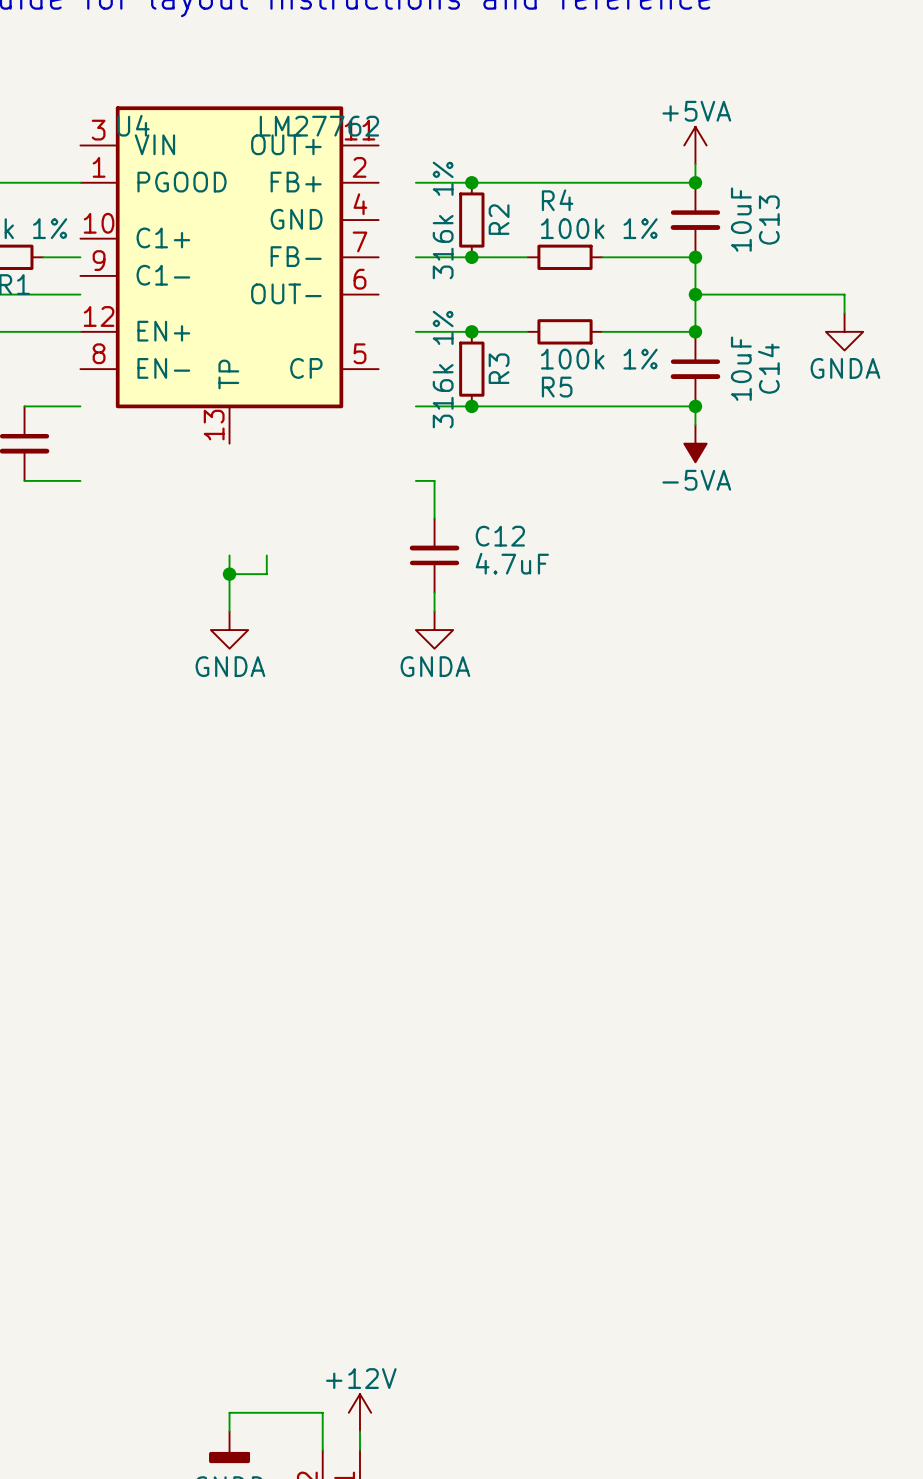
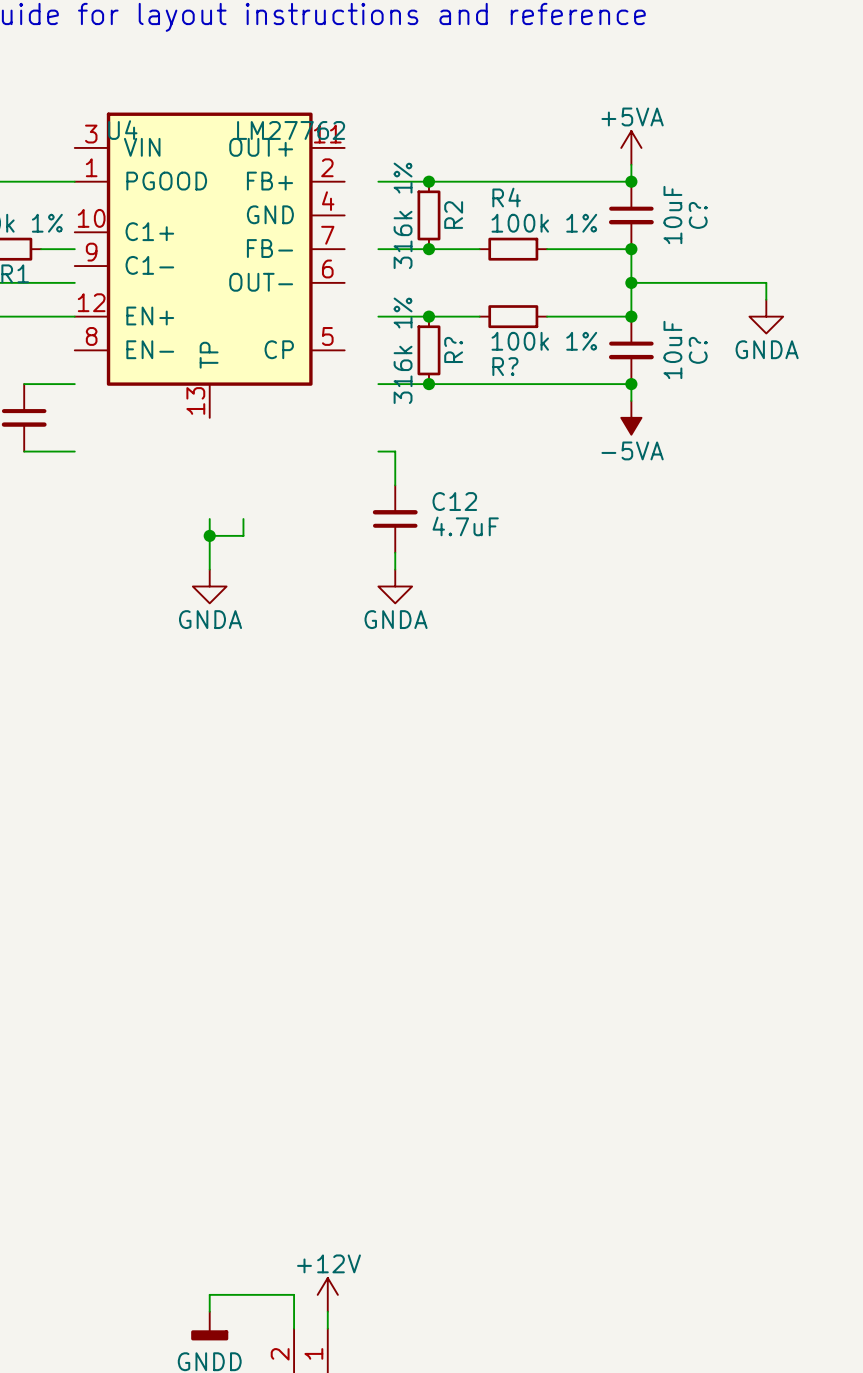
C13 name: C13 (769, 220) -> C? (698, 215)
R3 name: R3 (499, 368) -> R? (453, 349)
C14 name: C14 (768, 368) -> C? (698, 350)
R5 name: R5 (557, 387) -> R? (505, 366)

